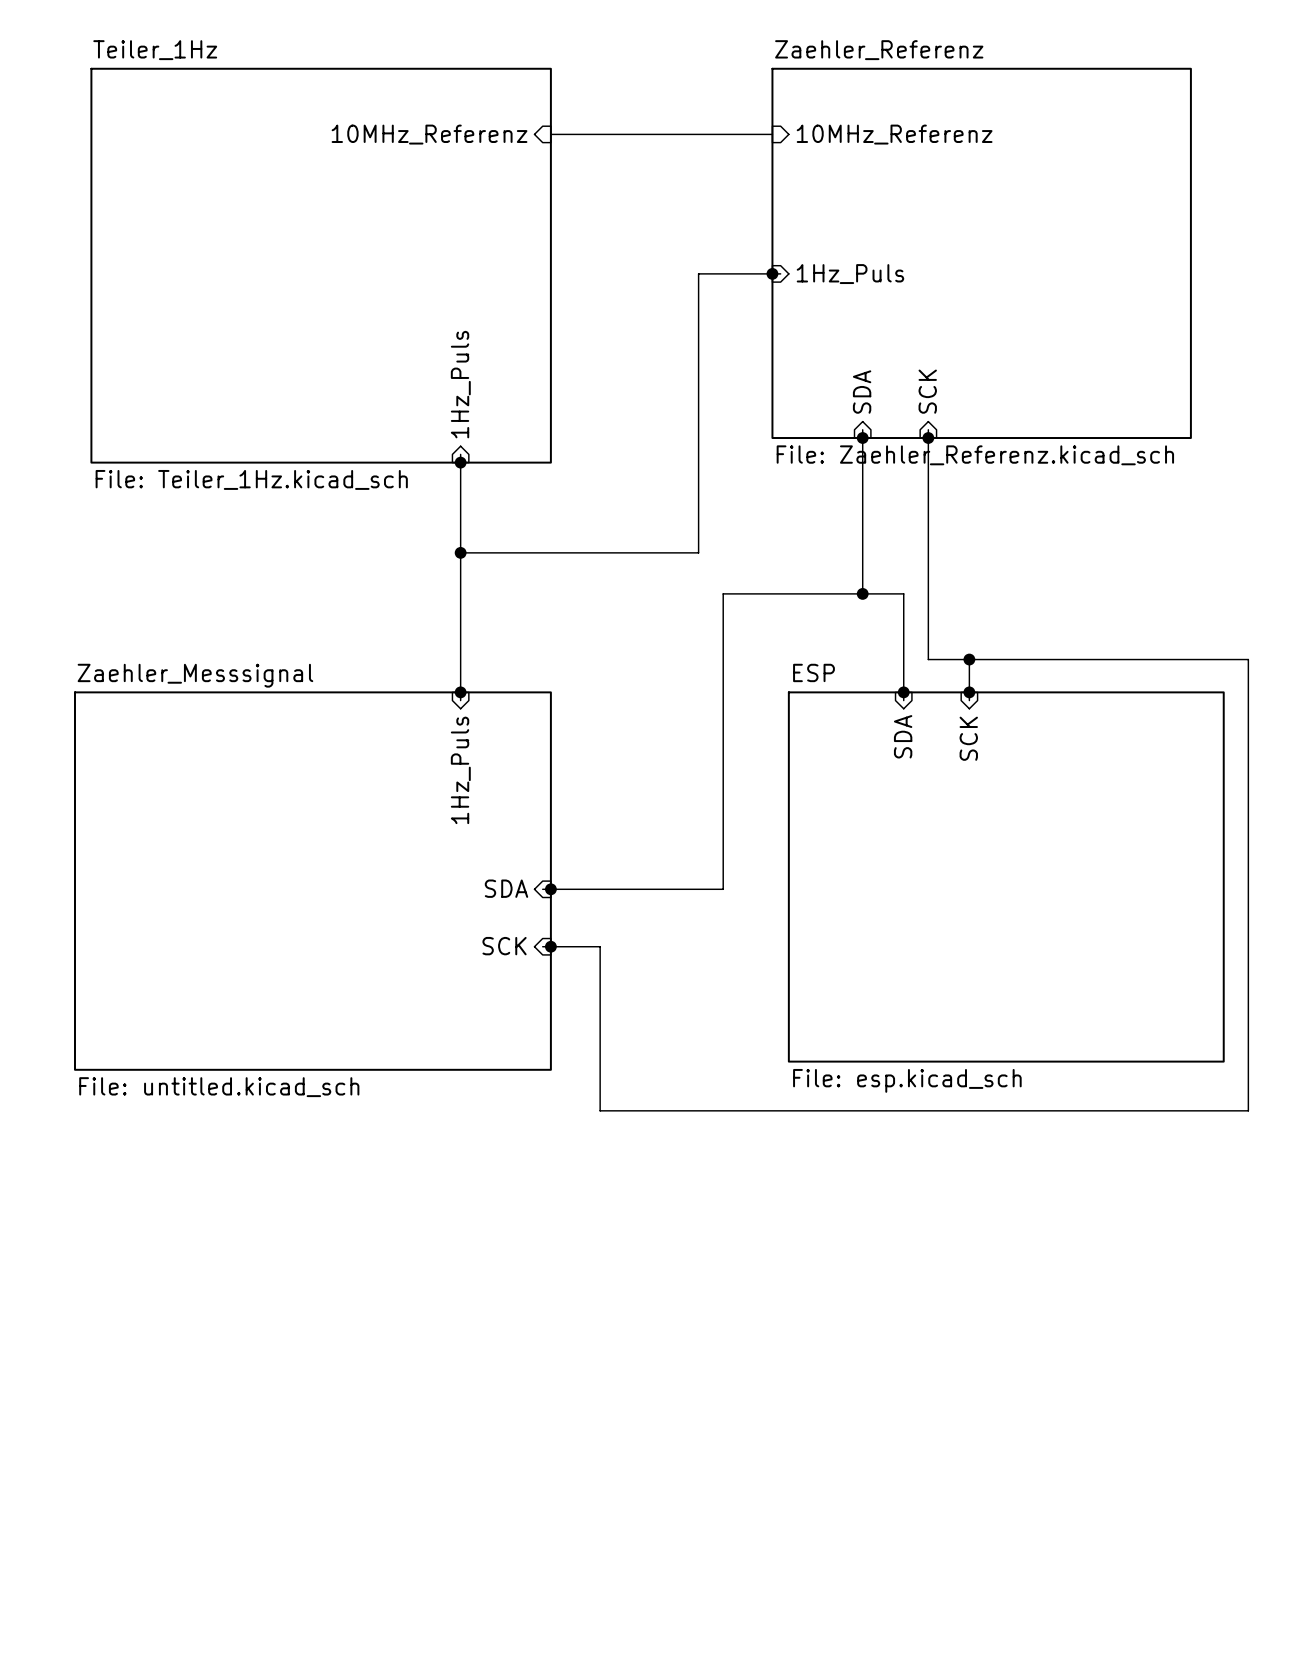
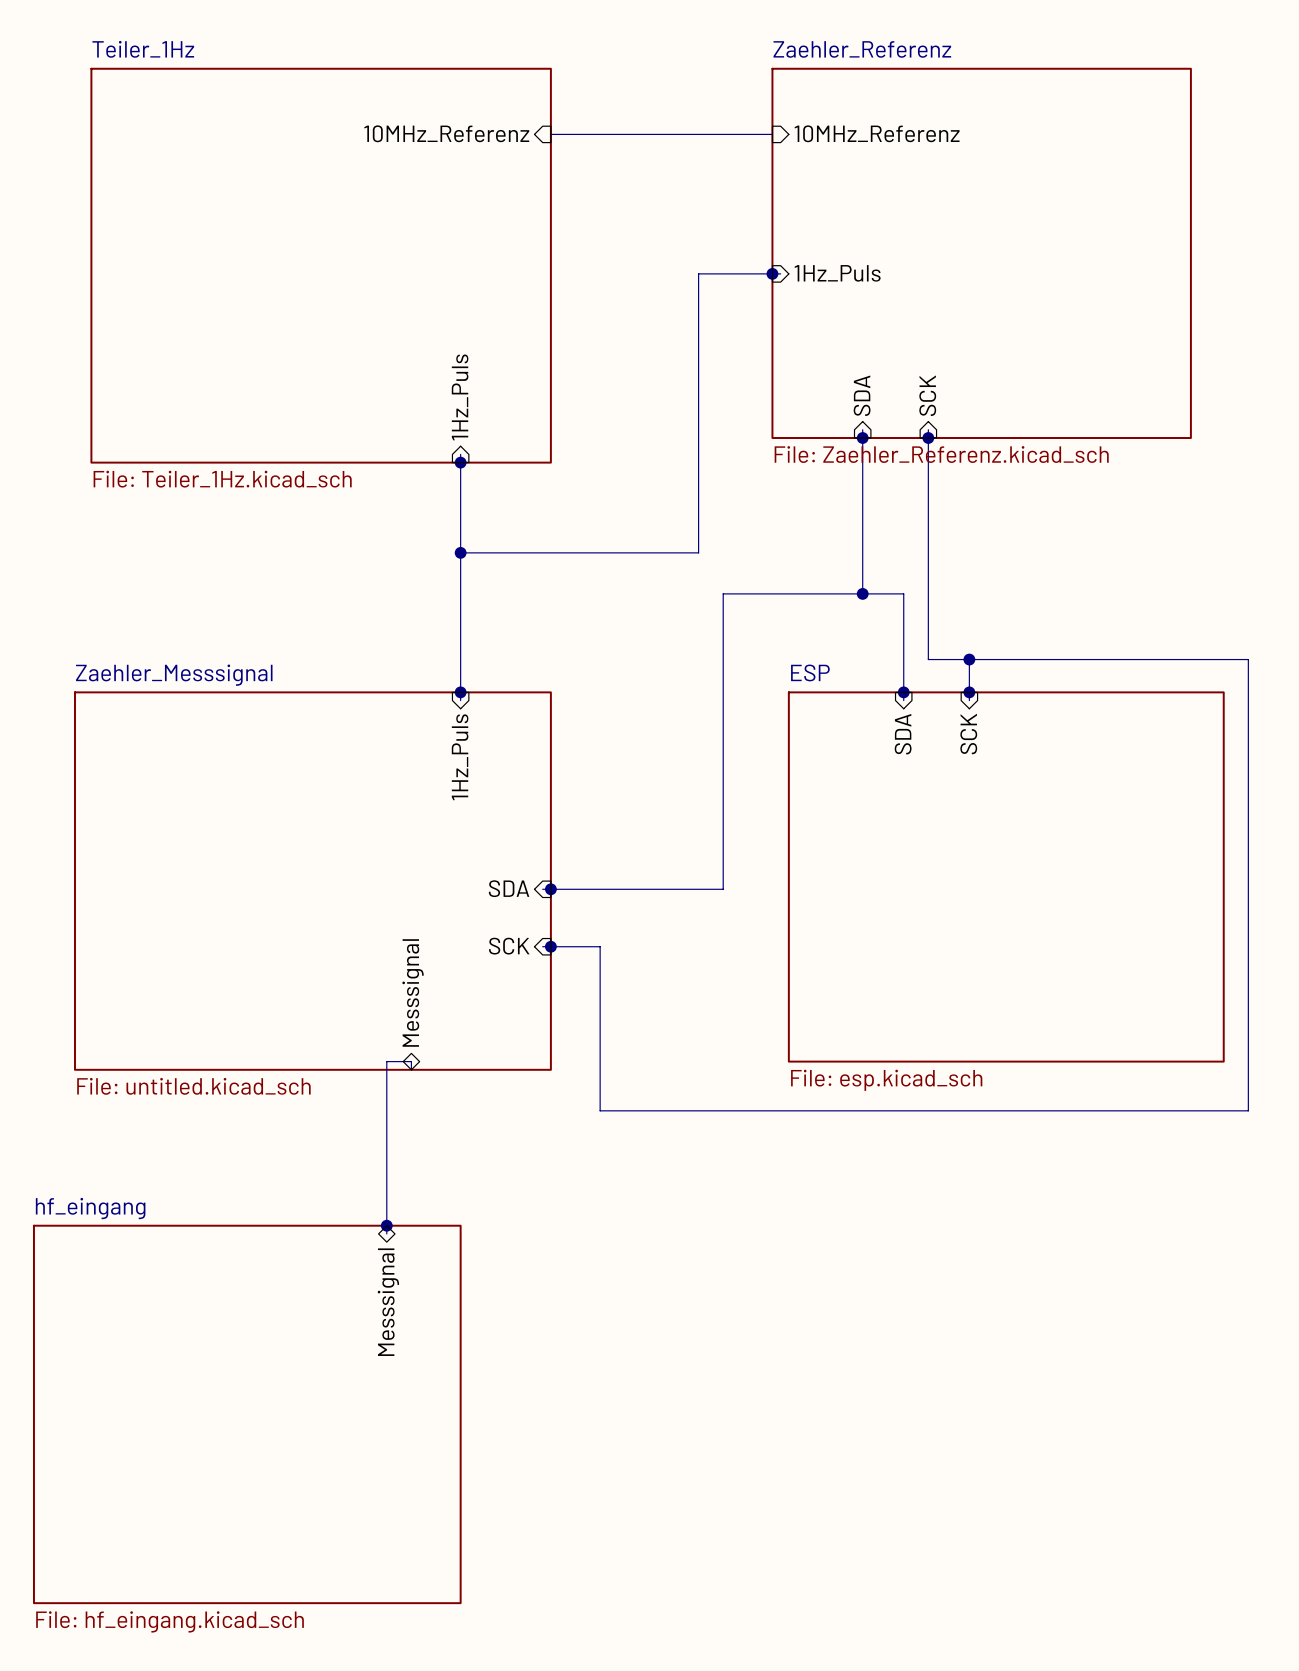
sheet pin: none -> Messsignal (413, 992)
wire: none -> (411, 1069) (411, 1061) (386, 1061) (386, 1233)
junction: none -> (386, 1225)
sheet pin: none -> Messsignal (388, 1302)
sheet hf_eingang: none -> File: hf_eingang.kicad_sch (247, 1414)

